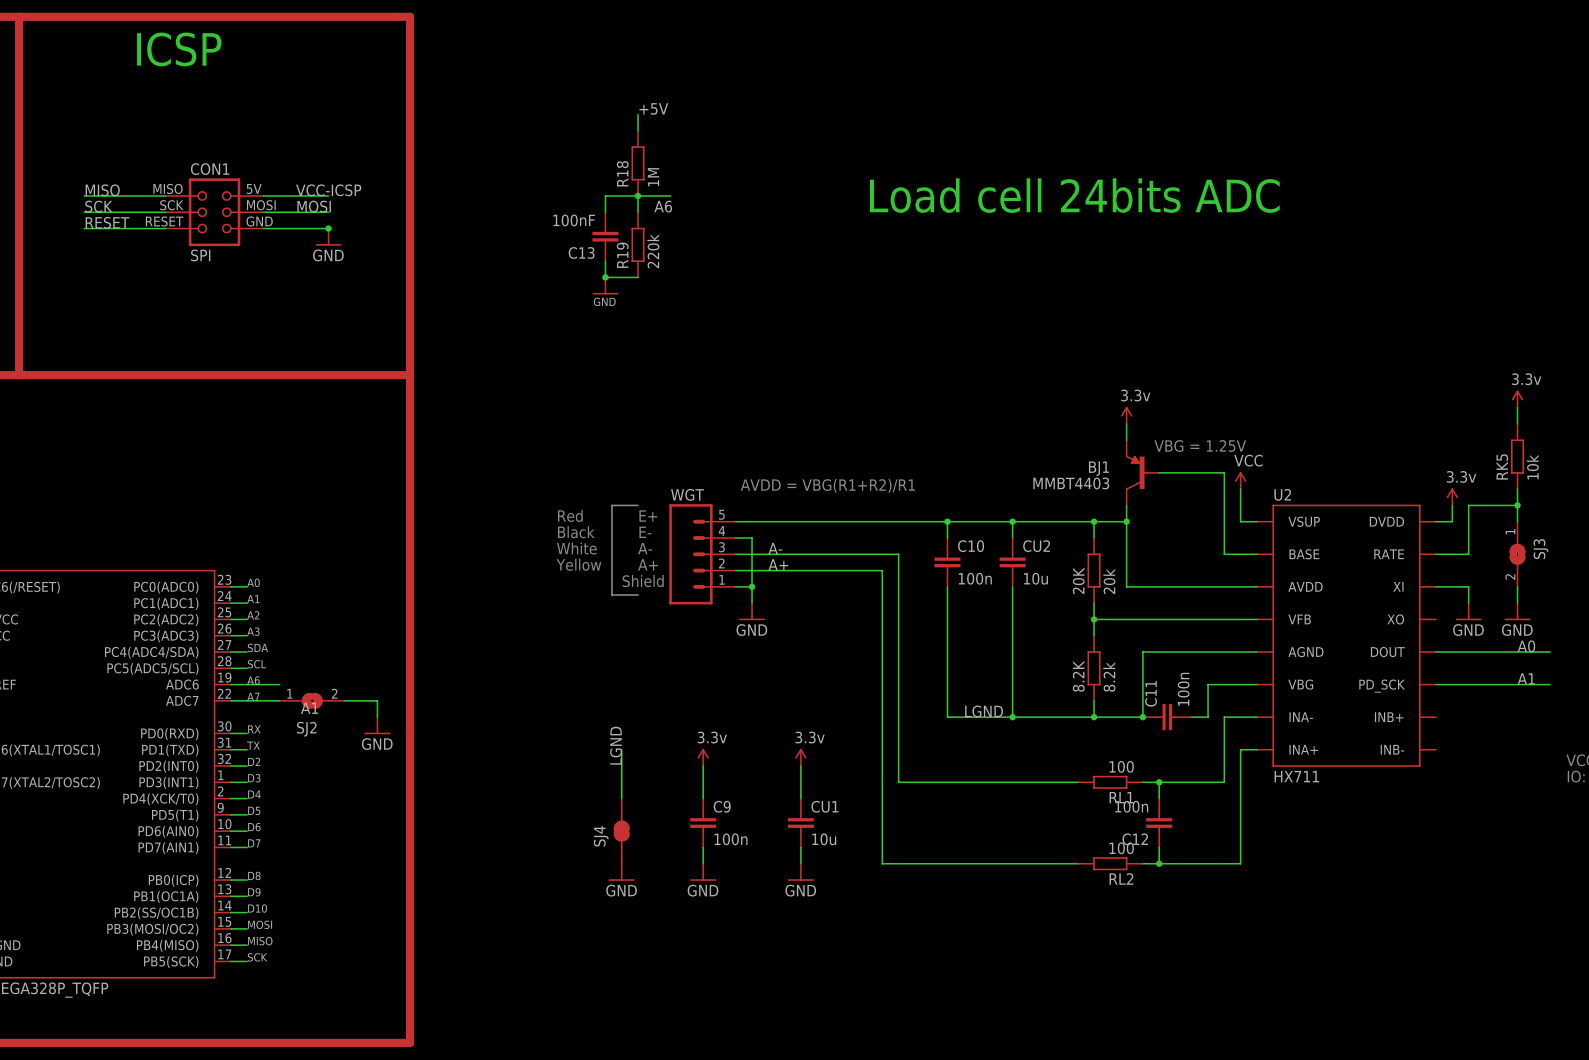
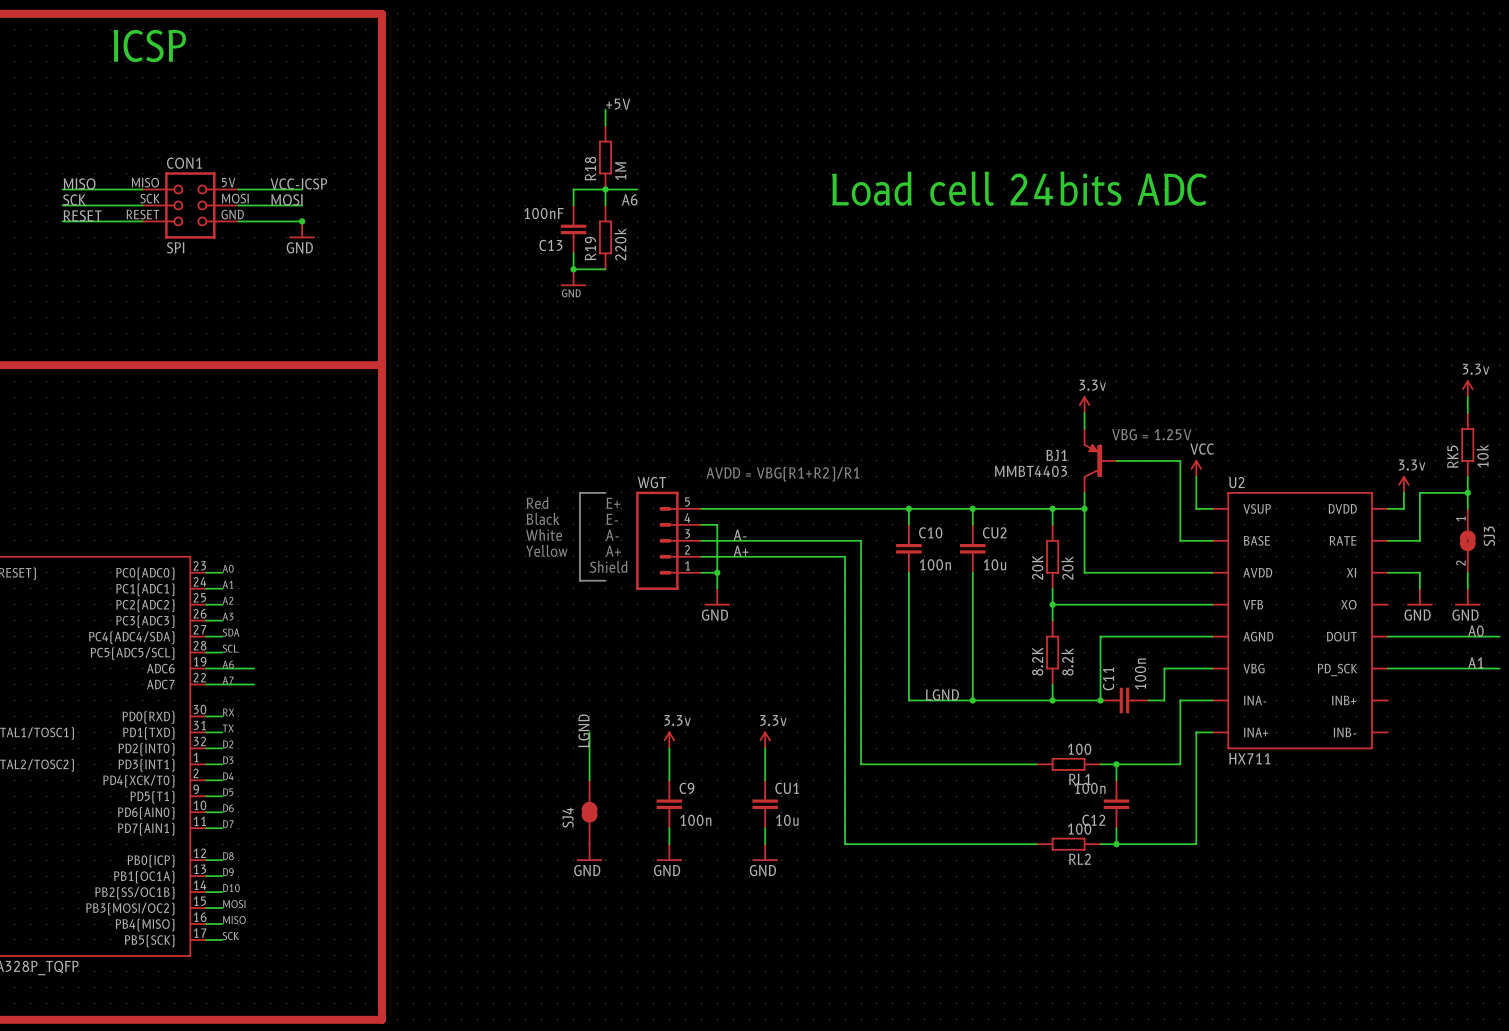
SJ2: A1 (312, 700) -> none
wire: (344, 700) (377, 700) (377, 717) -> none
power symbol: GND (377, 725) -> none

